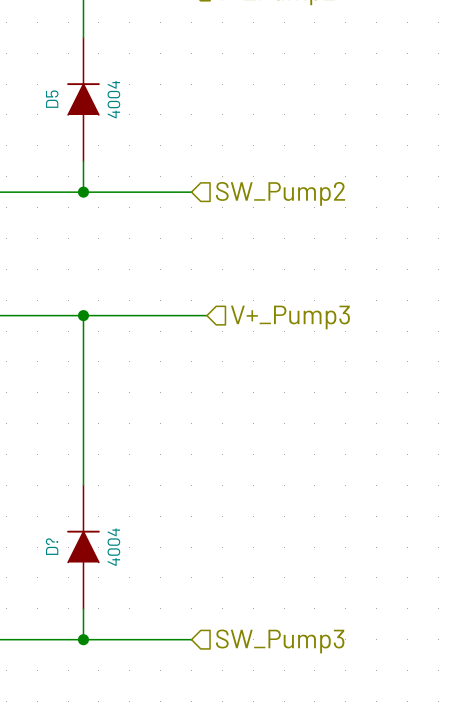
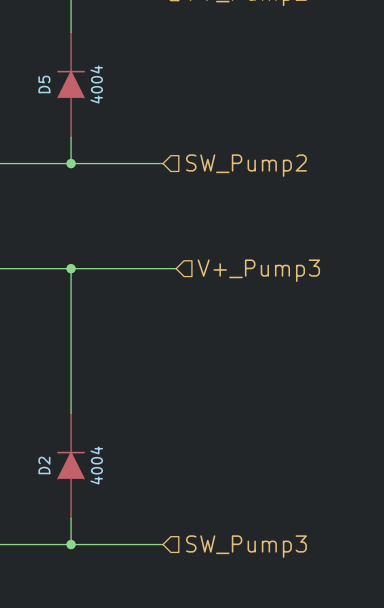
D? name: D? (52, 546) -> D2 (44, 465)

